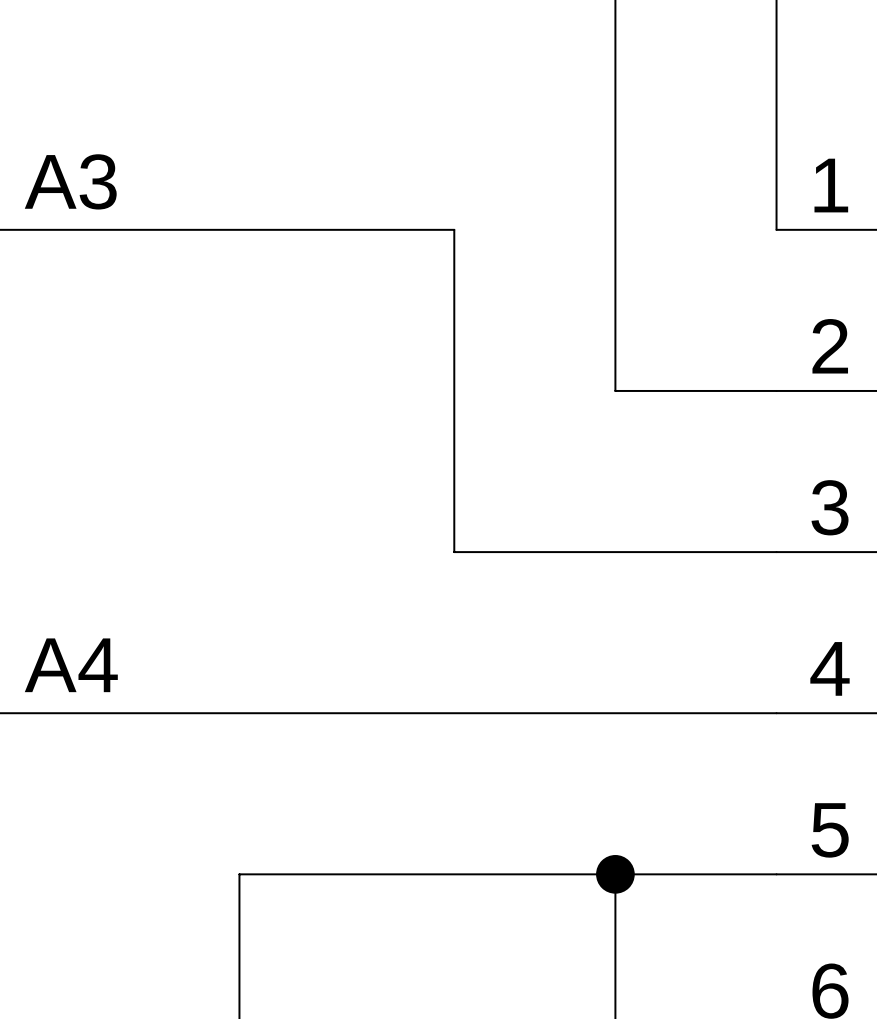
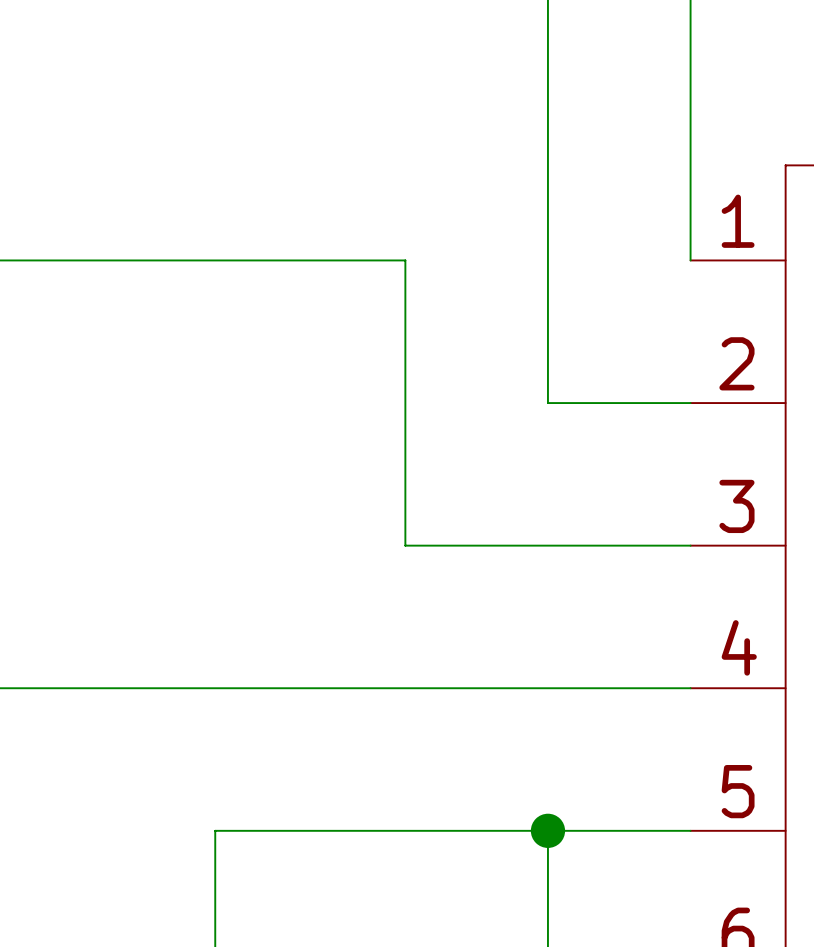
label: A3 (70, 181) -> none
label: A4 (71, 665) -> none

